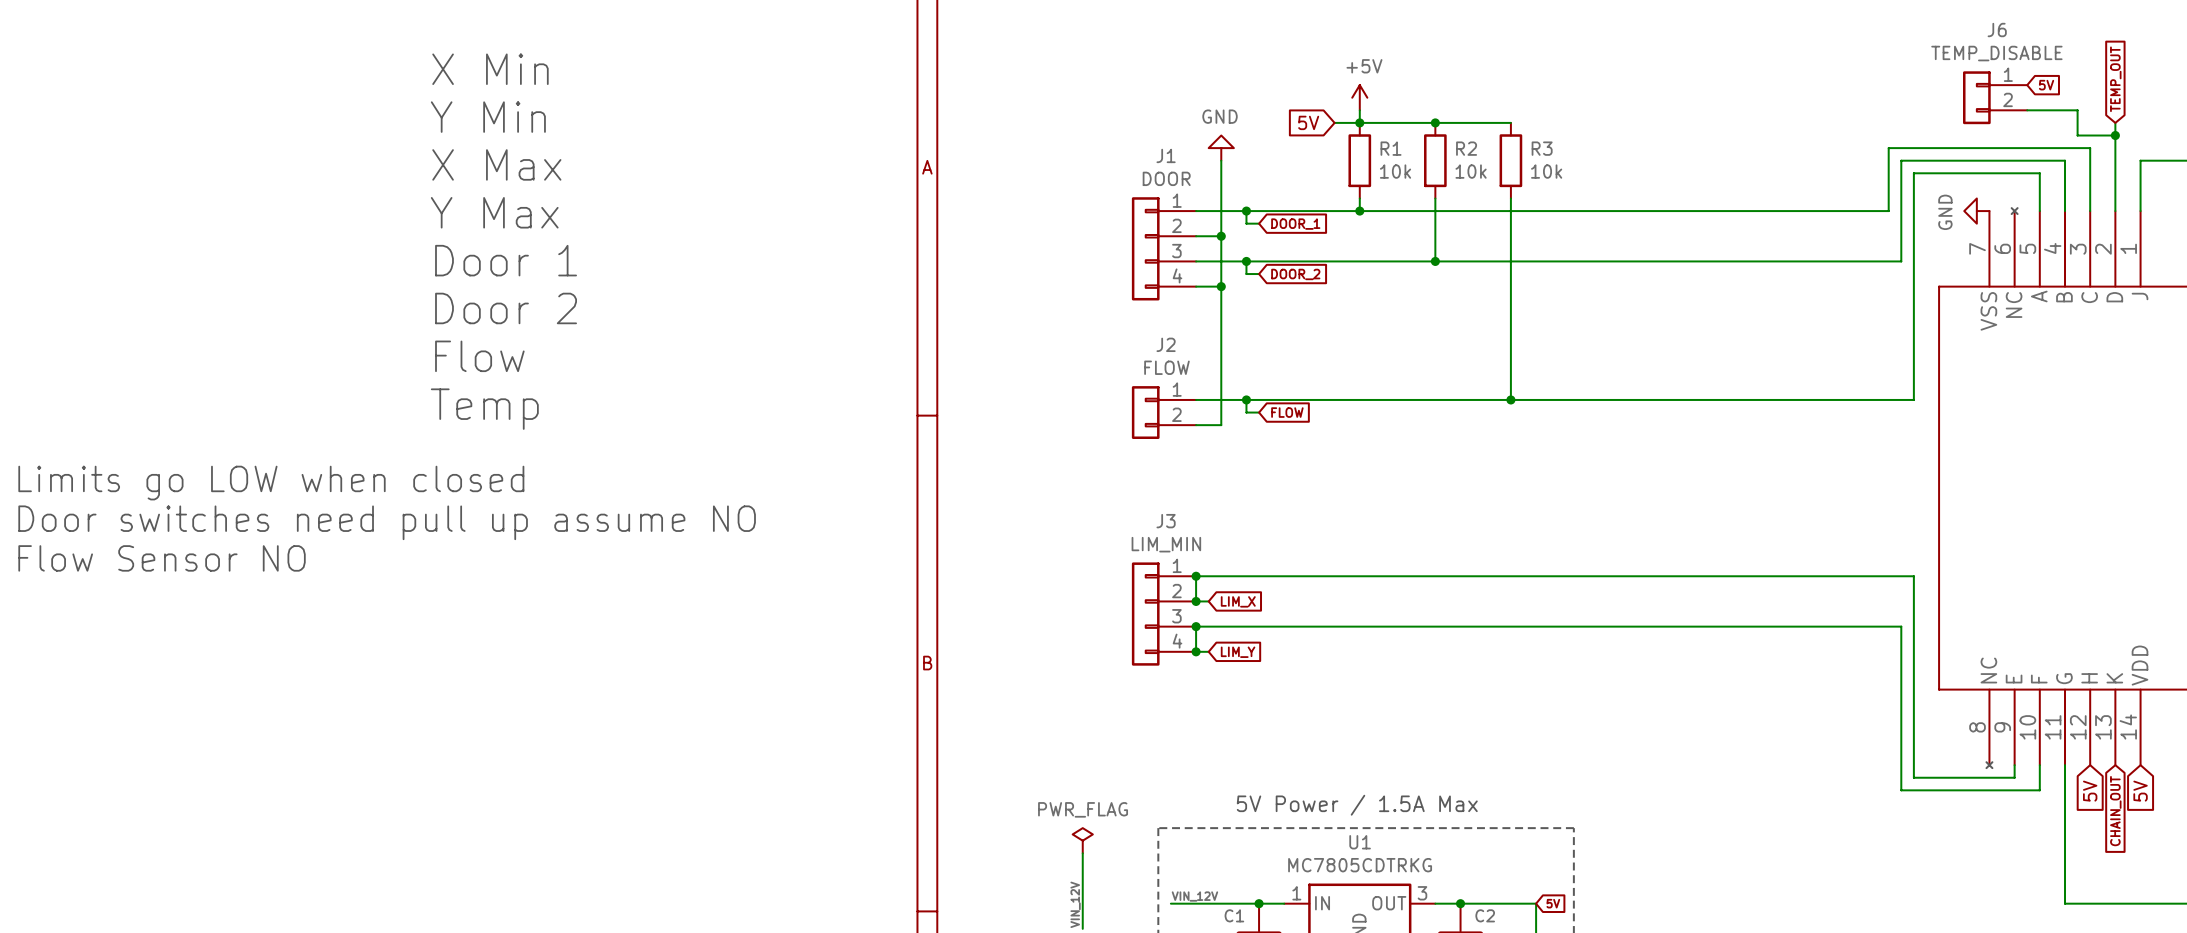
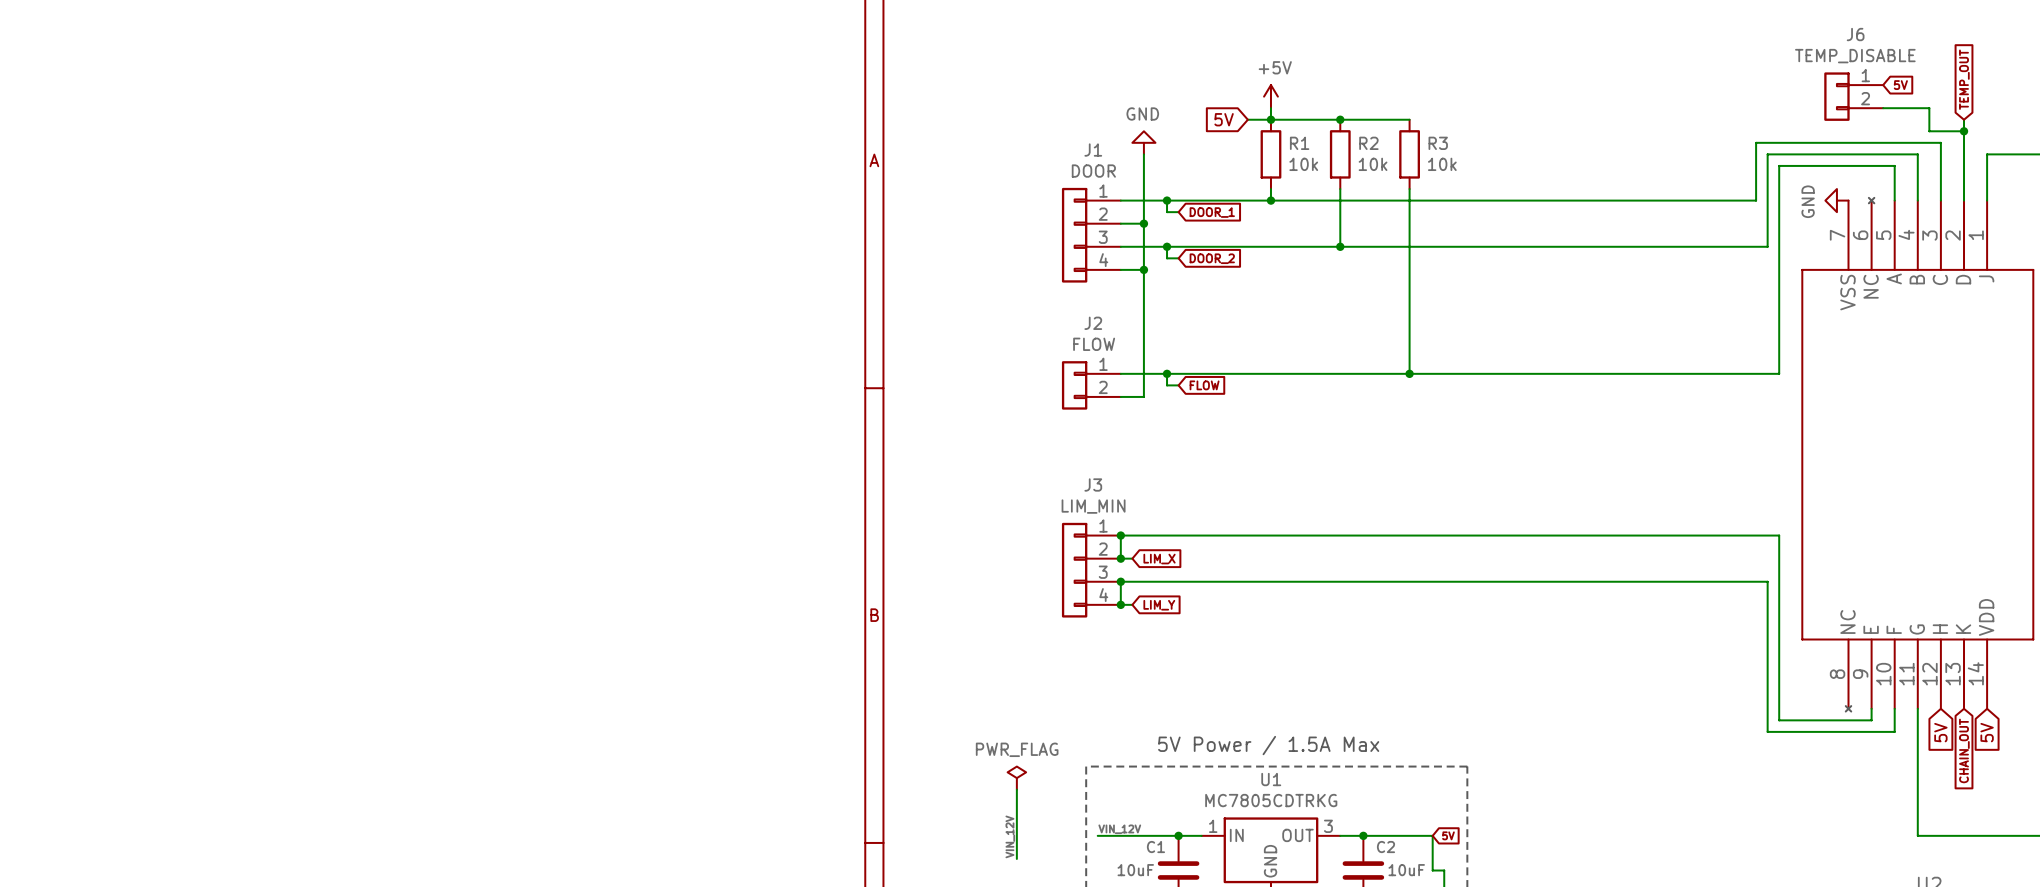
text: X Min (490, 69) -> none
text: Y Min (488, 117) -> none
text: X Max (496, 164) -> none
text: Y Max (494, 212) -> none
text: Door 1 (506, 260) -> none
text: Door 2 (506, 308) -> none
text: Flow (479, 356) -> none
text: Temp (484, 409) -> none
text: Limits go LOW when closed (271, 483) -> none
text: Door switches need pull up assume NO (387, 522) -> none
text: Flow Sensor NO (162, 558) -> none

